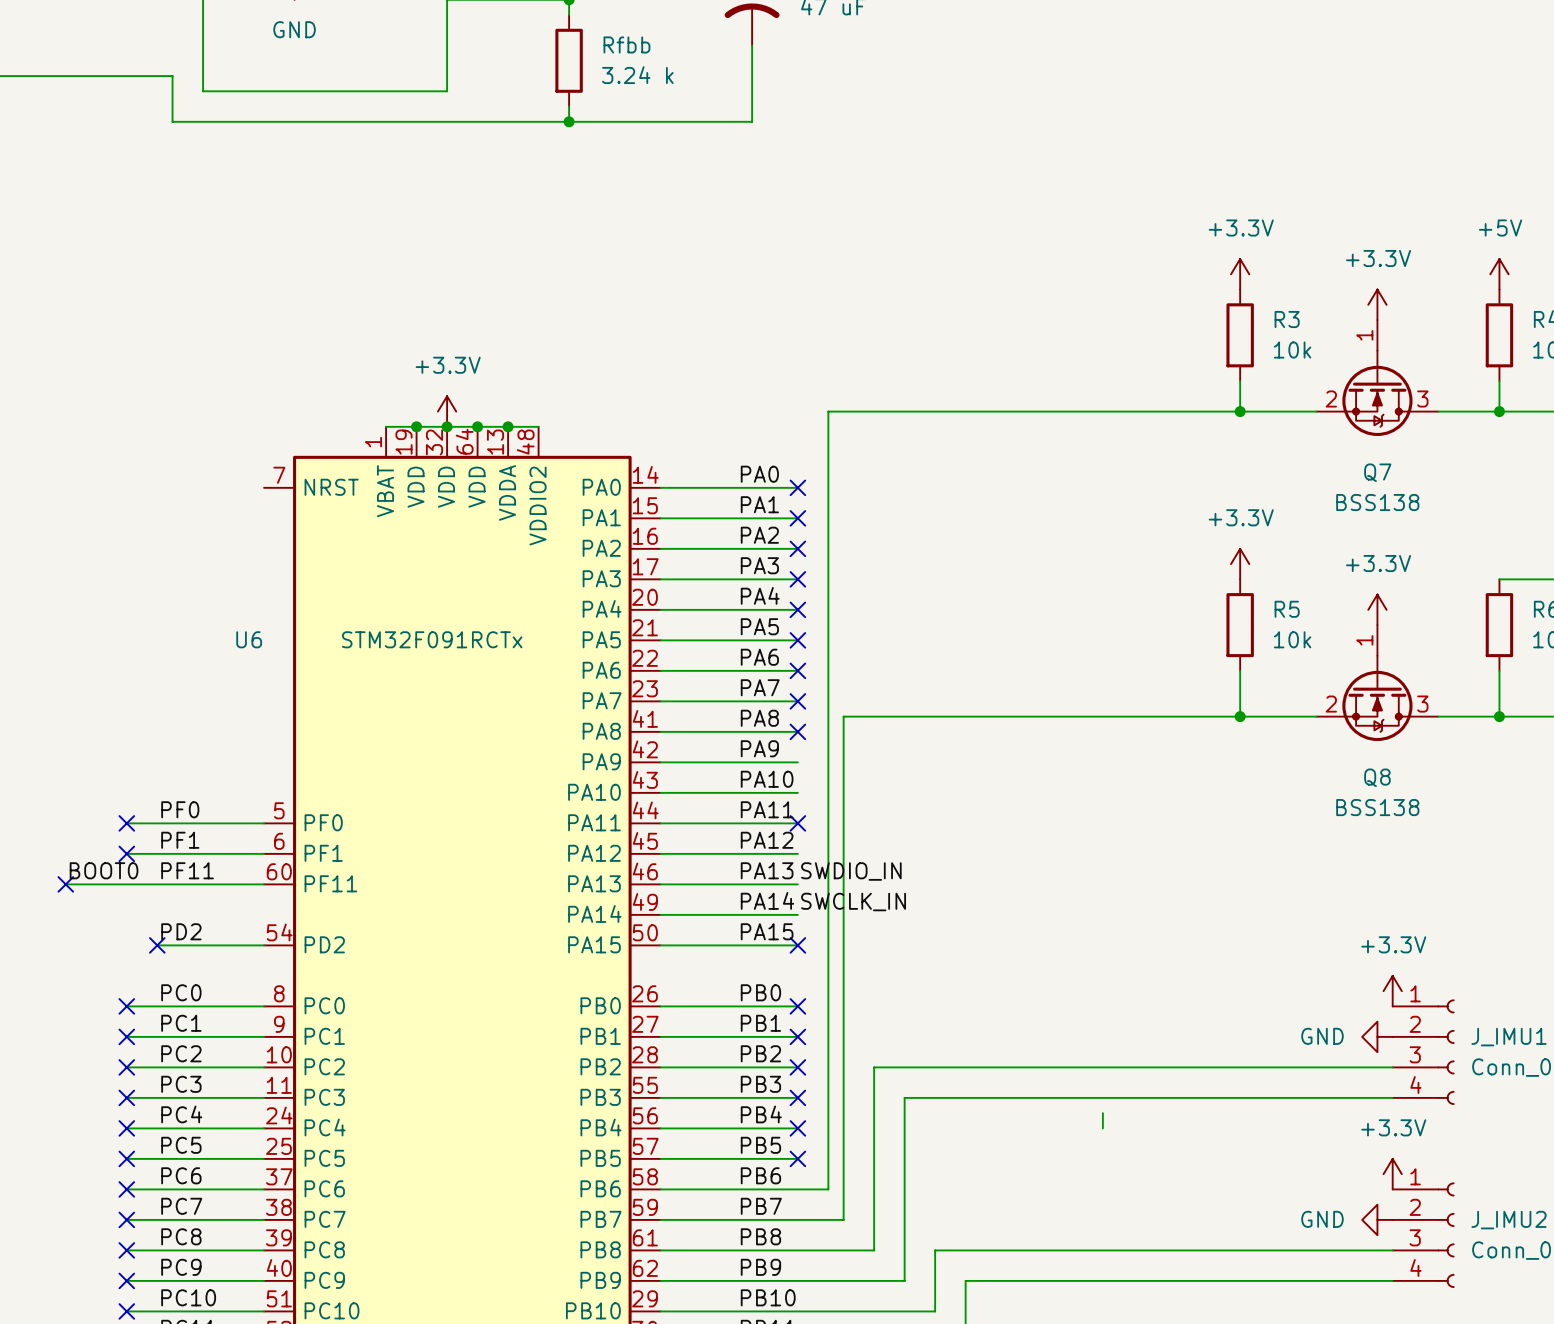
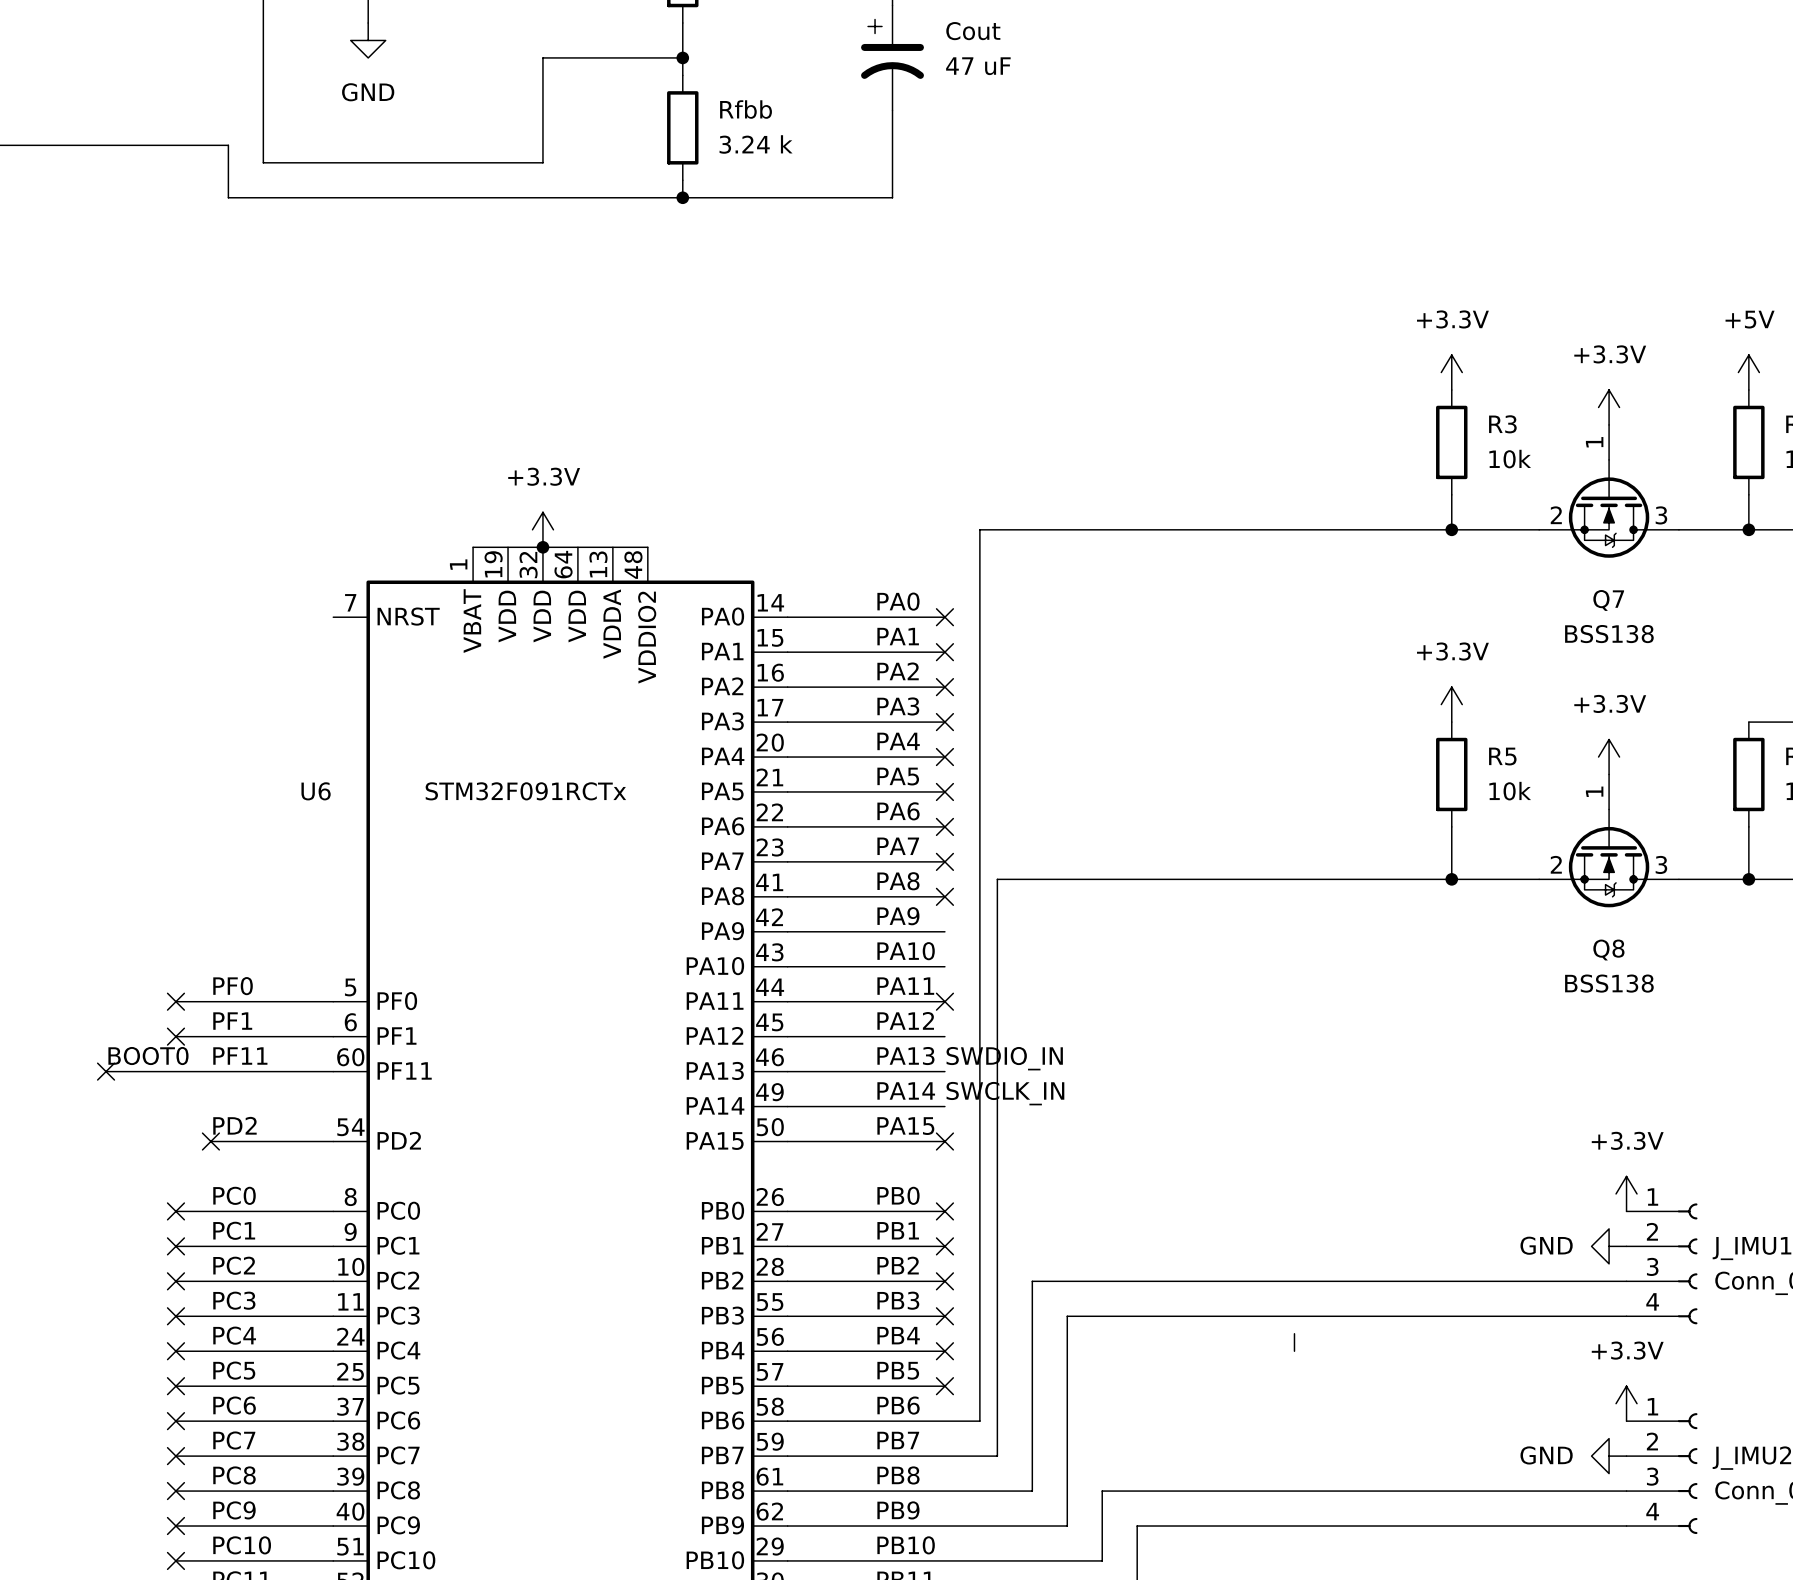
junction: (416, 426) -> none
junction: (477, 426) -> none
junction: (508, 426) -> none

